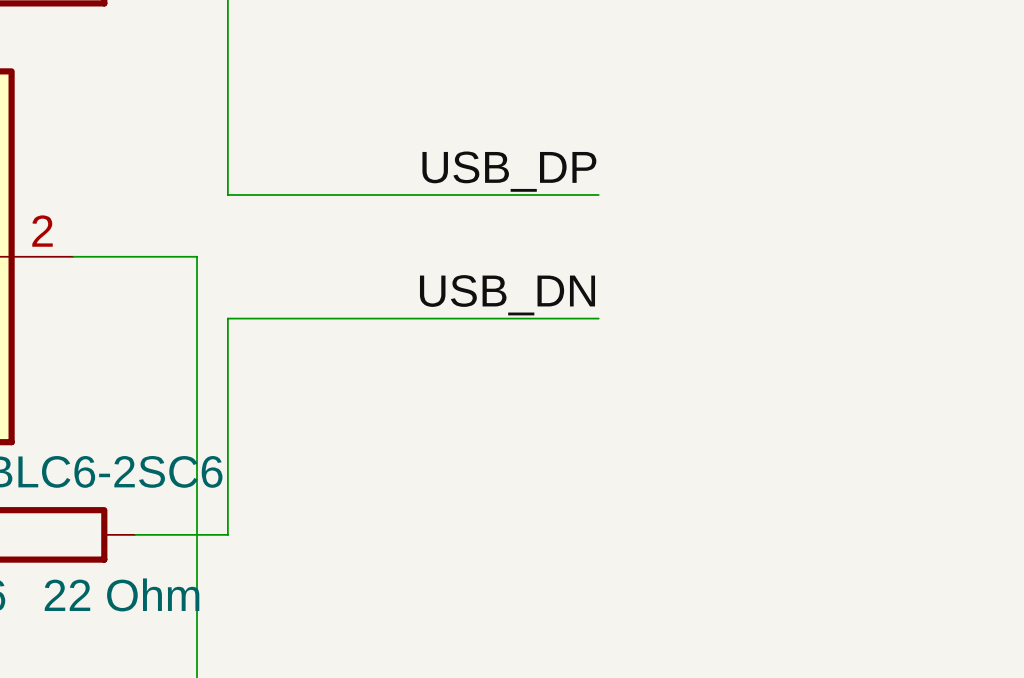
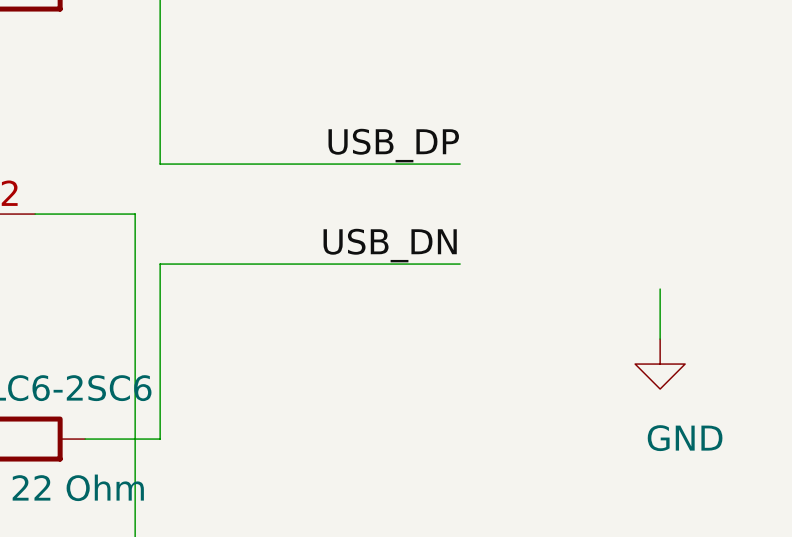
wire: none -> (660, 289) (660, 339)
power symbol: none -> GND (660, 364)

